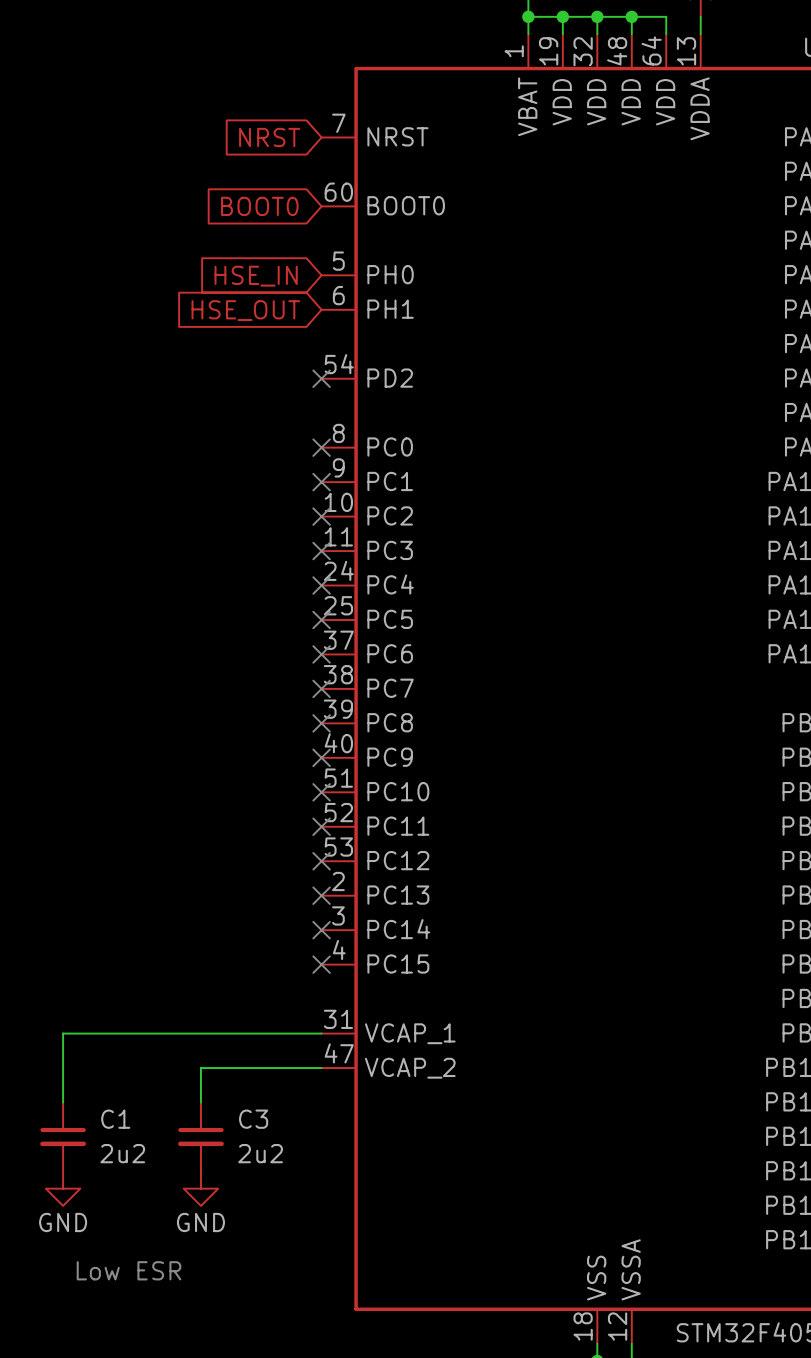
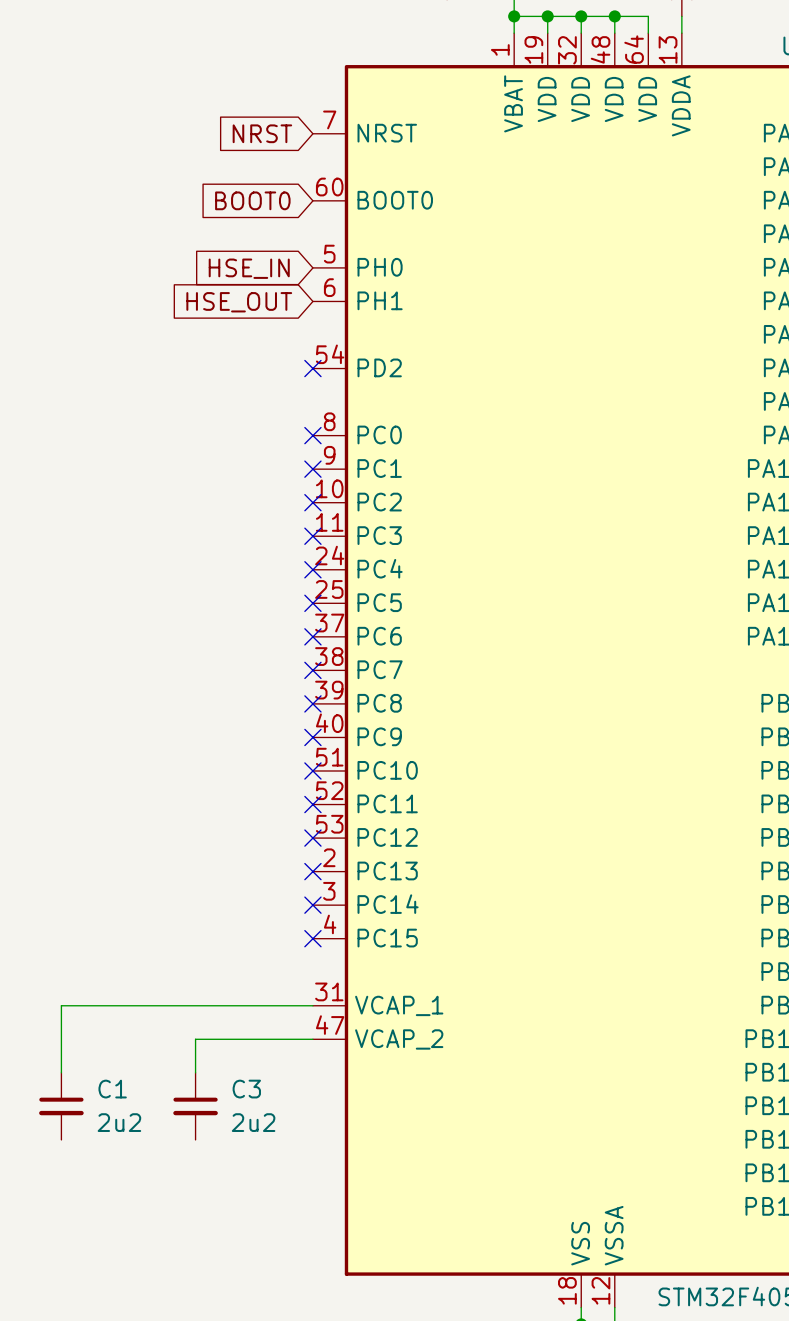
power symbol: GND (63, 1188) -> none
power symbol: GND (200, 1188) -> none
text: Low ESR (129, 1270) -> none

